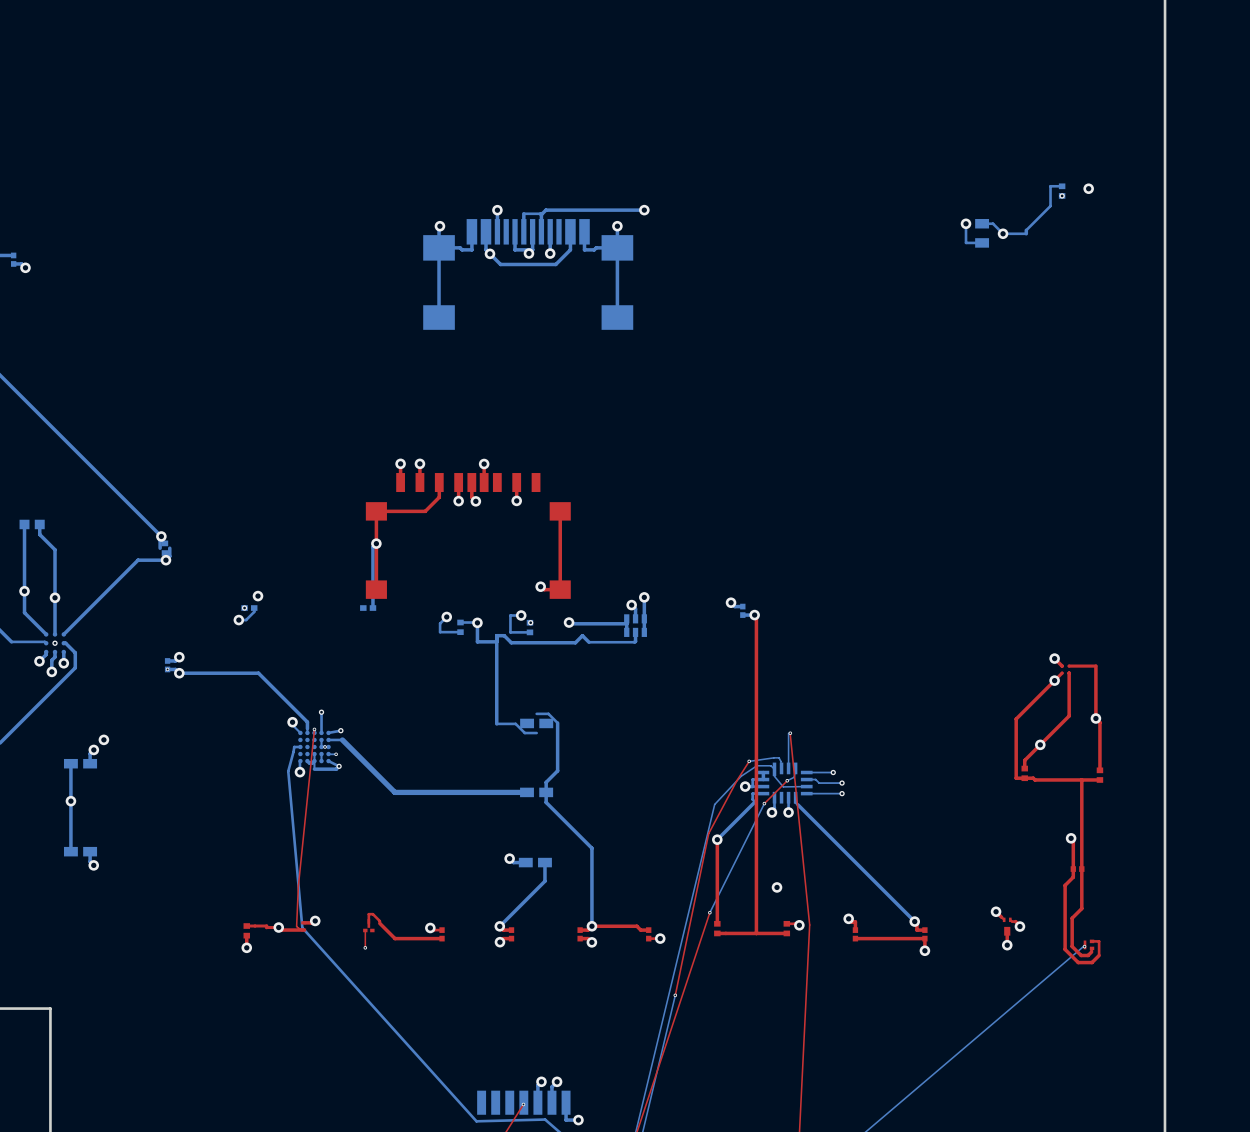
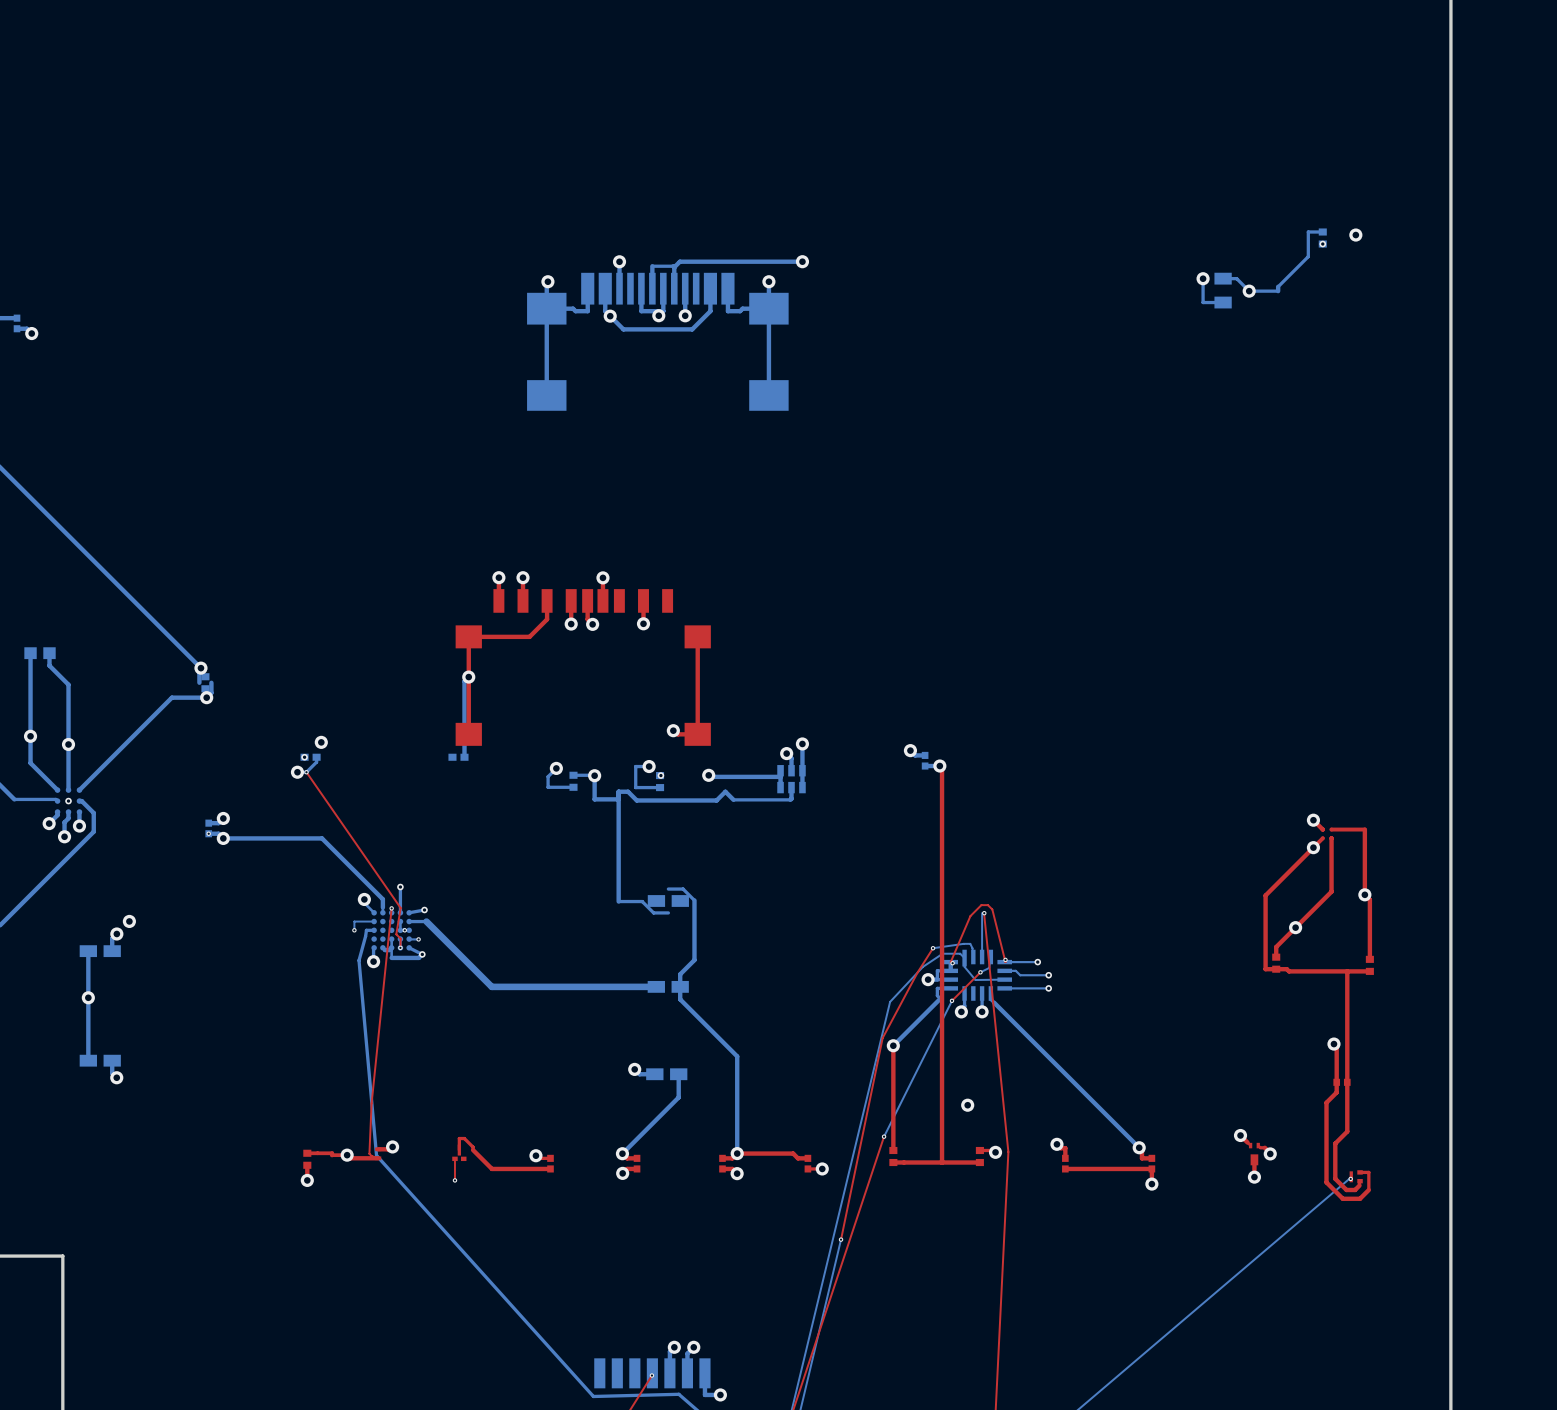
top track: none -> (306, 772) (400, 908) (396, 934) (400, 938) (400, 947)
via: none -> (306, 772)
bottom track: none -> (374, 921) (354, 921) (354, 930)
via: none -> (354, 930)
via: none -> (400, 947)
top track: none -> (1005, 959) (1005, 962) (992, 909) (987, 905) (981, 905) (970, 916) (950, 962) (952, 963)
via: none -> (1005, 959)
via: none -> (952, 963)

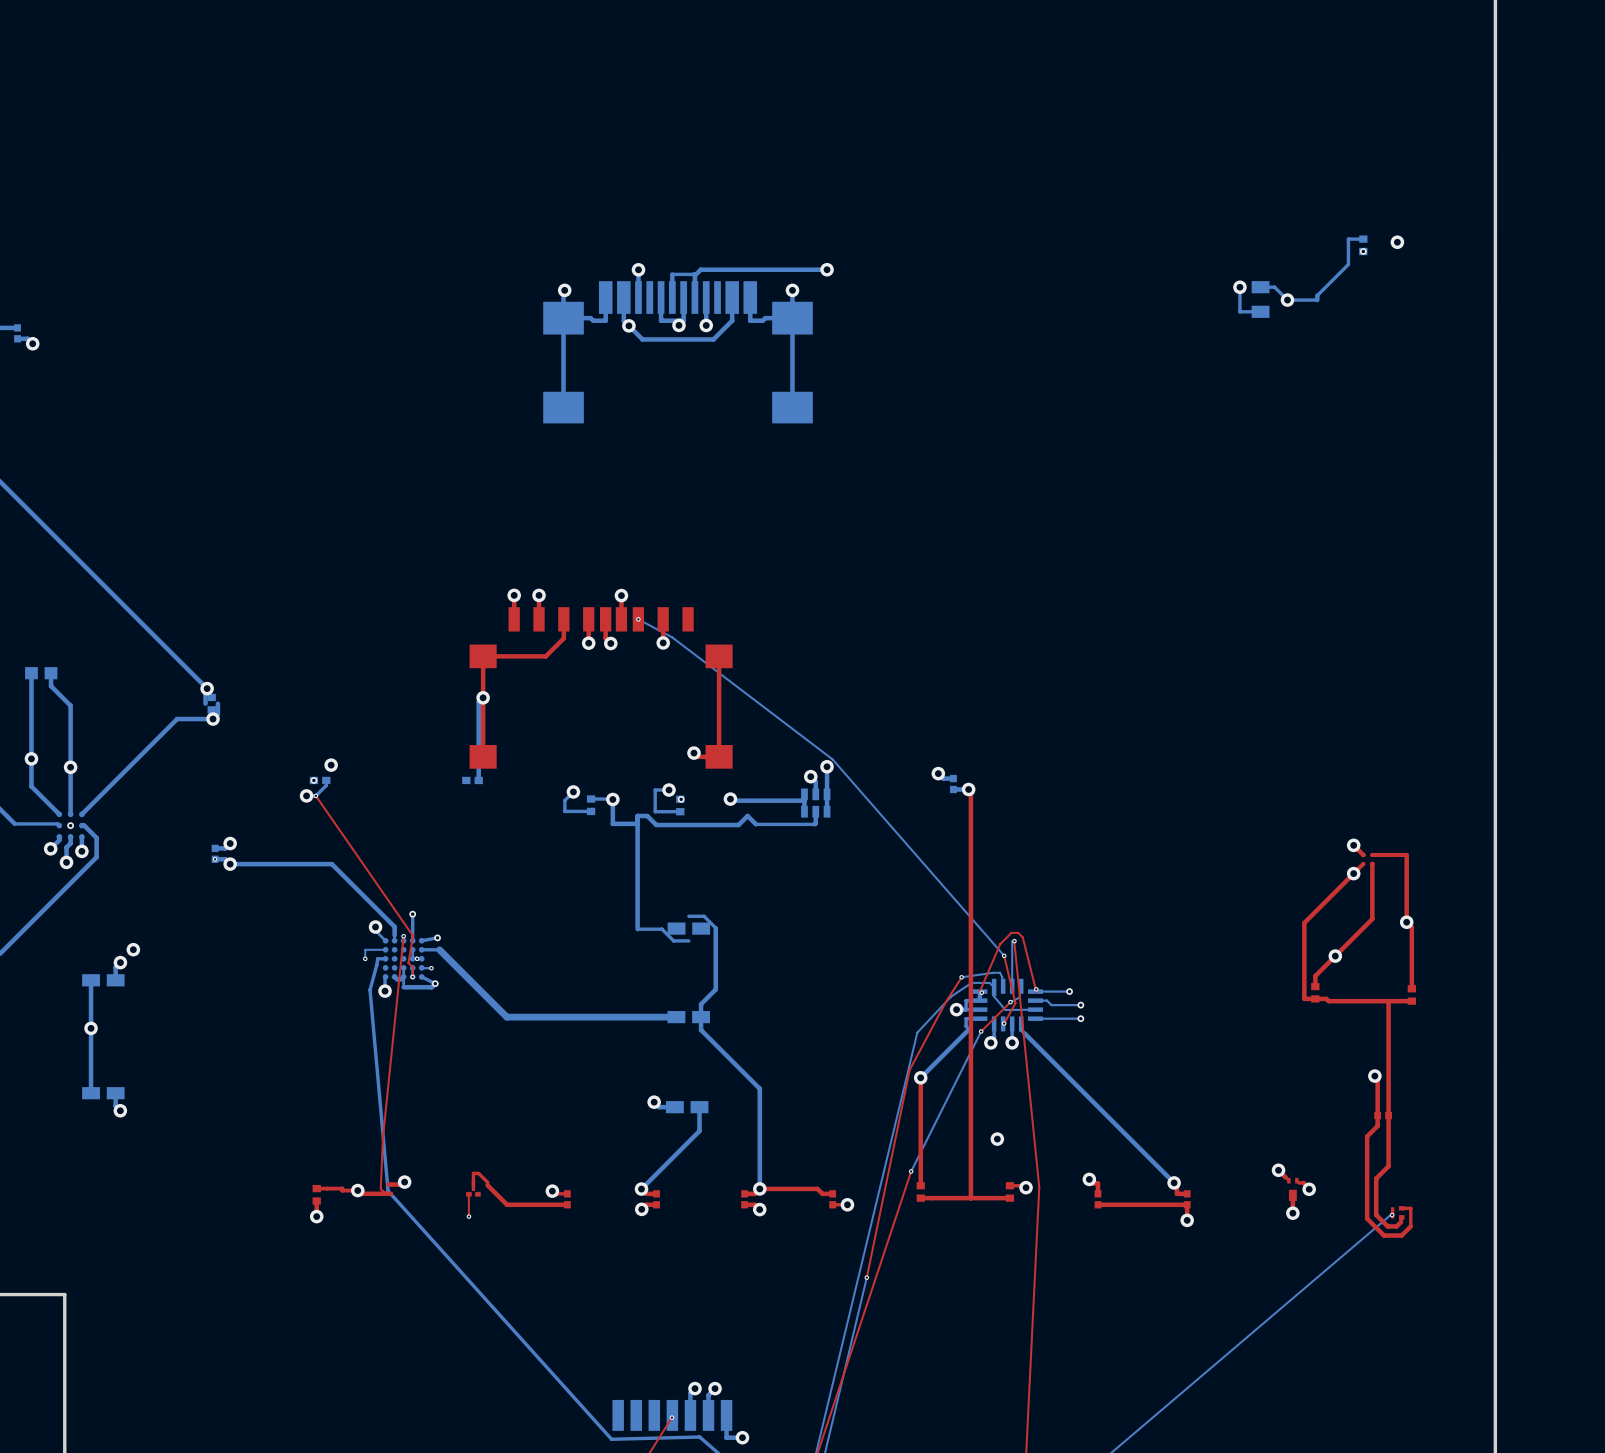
bottom track: none -> (638, 619) (672, 637) (832, 759) (1004, 955)
via: none -> (638, 619)
top track: none -> (1004, 955) (1015, 1003) (1004, 1023)
via: none -> (1004, 955)
via: none -> (1004, 1023)

